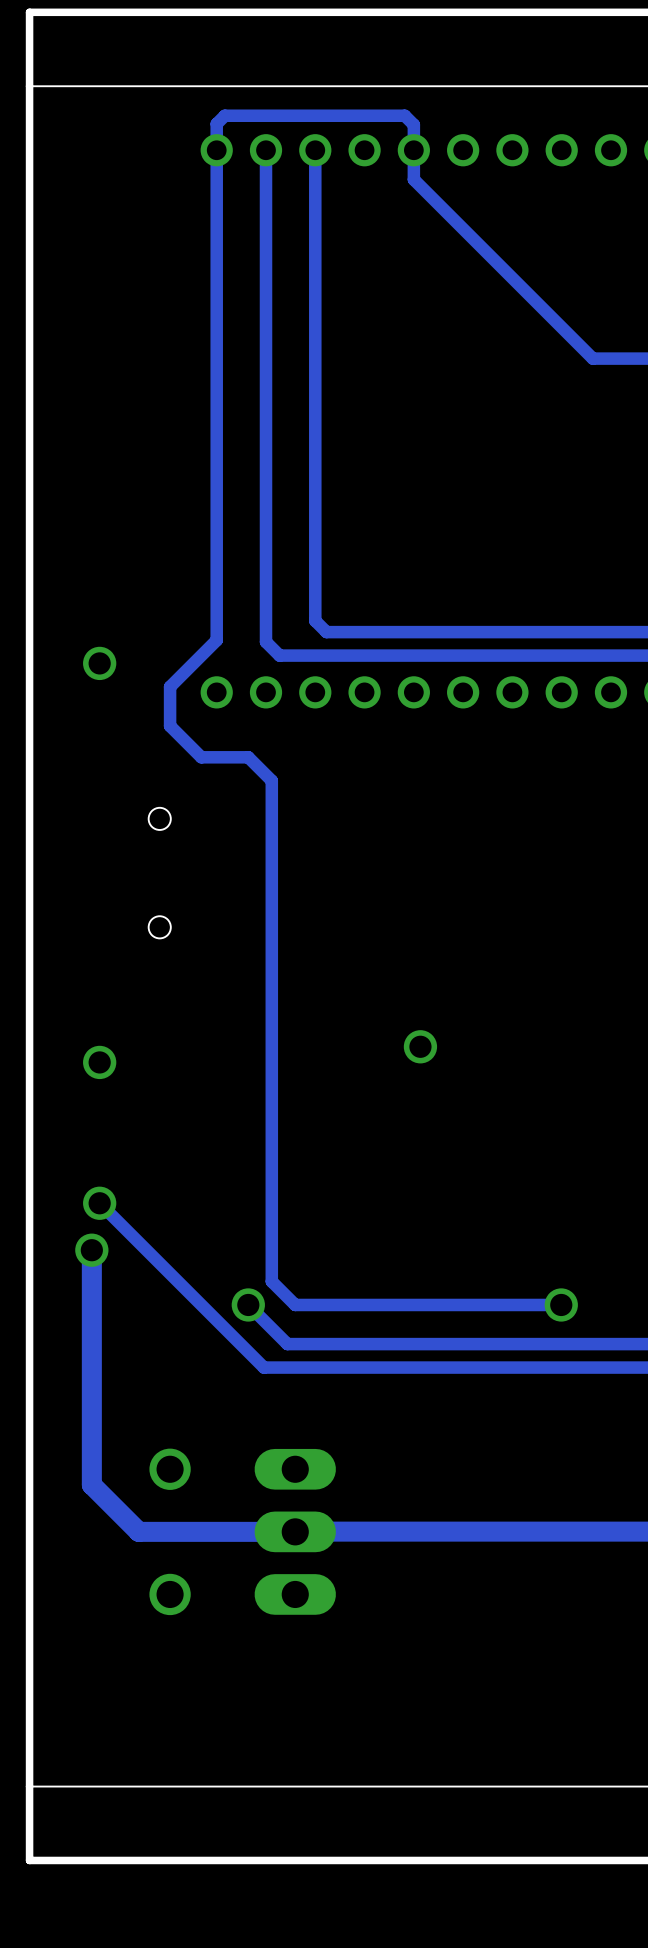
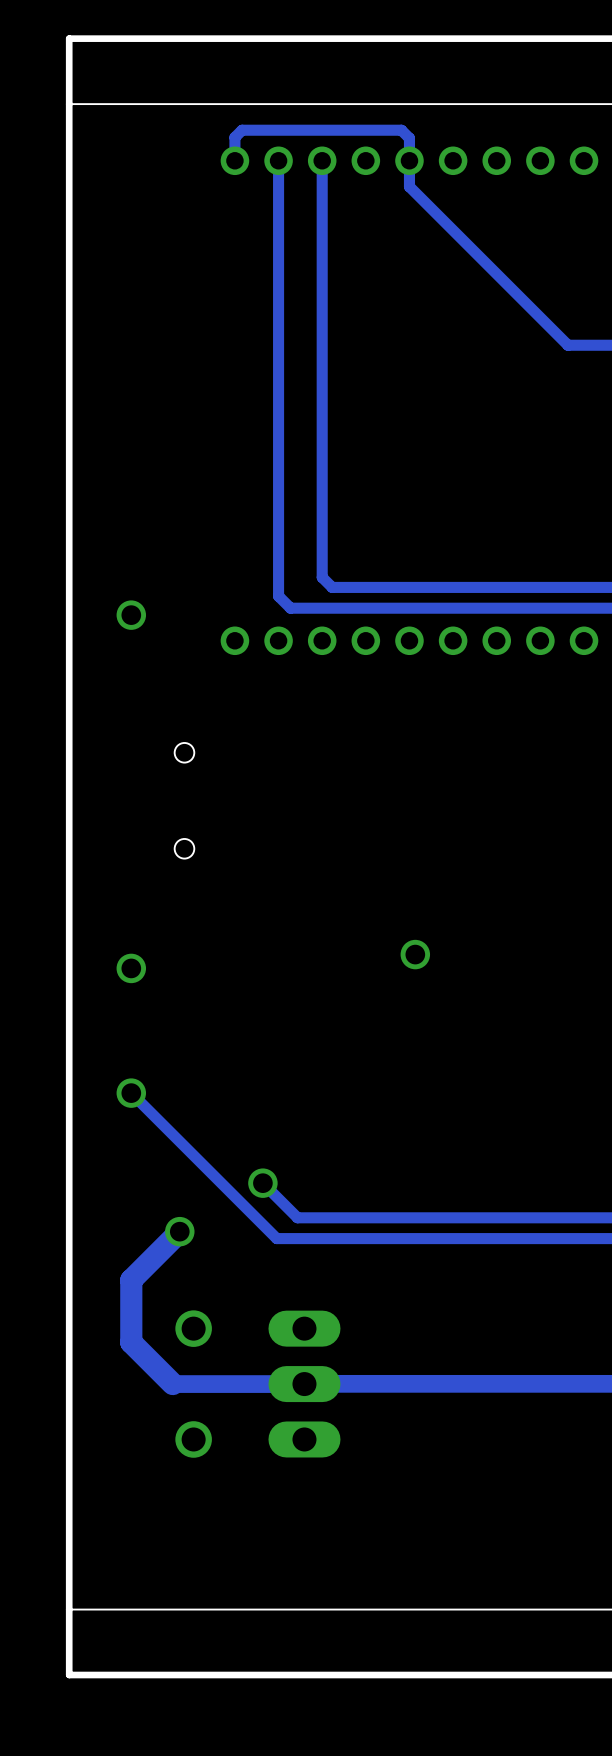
track: (216, 150) (216, 640) (170, 686) (170, 726) (201, 757) (248, 757) (271, 780) (271, 1281) (295, 1304) (561, 1304) -> none
track: (91, 1250) (91, 1484) (138, 1531) (146, 1531) -> (179, 1231) (131, 1280) (131, 1342) (172, 1384)
via position: (91, 1250) -> (179, 1231)
via: (561, 1304) -> none

